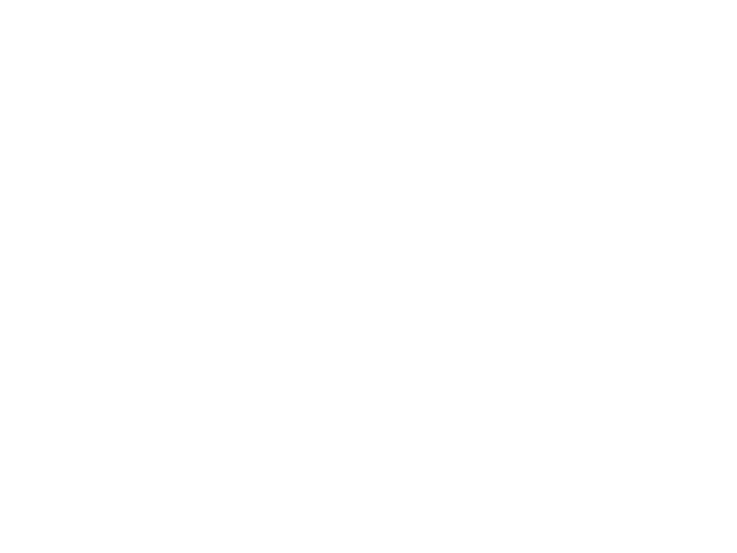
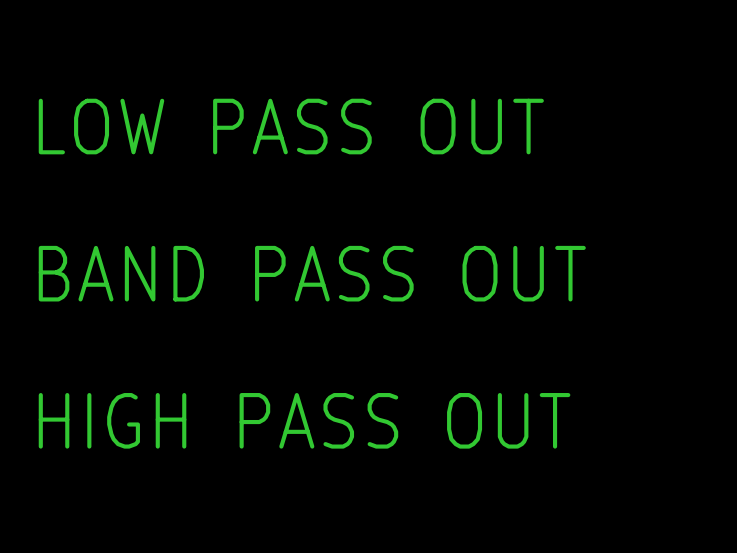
text: none -> LOW PASS OUT (291, 126)
text: none -> BAND PASS OUT (312, 273)
text: none -> HIGH PASS OUT (304, 420)

